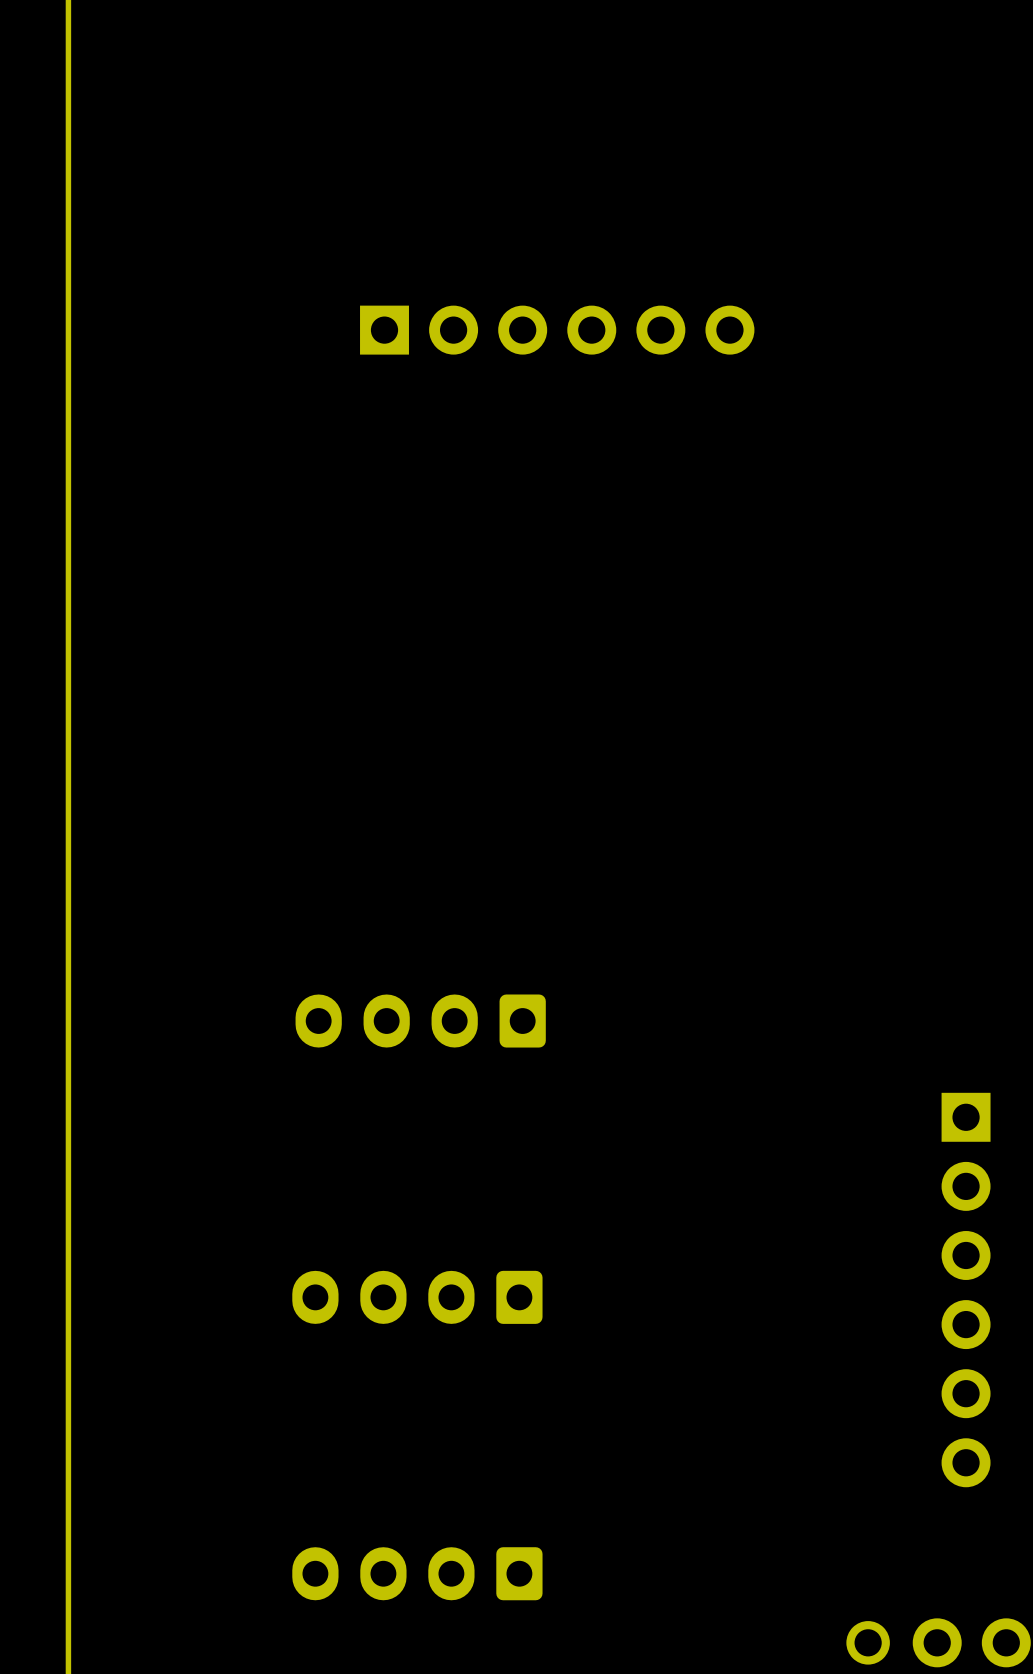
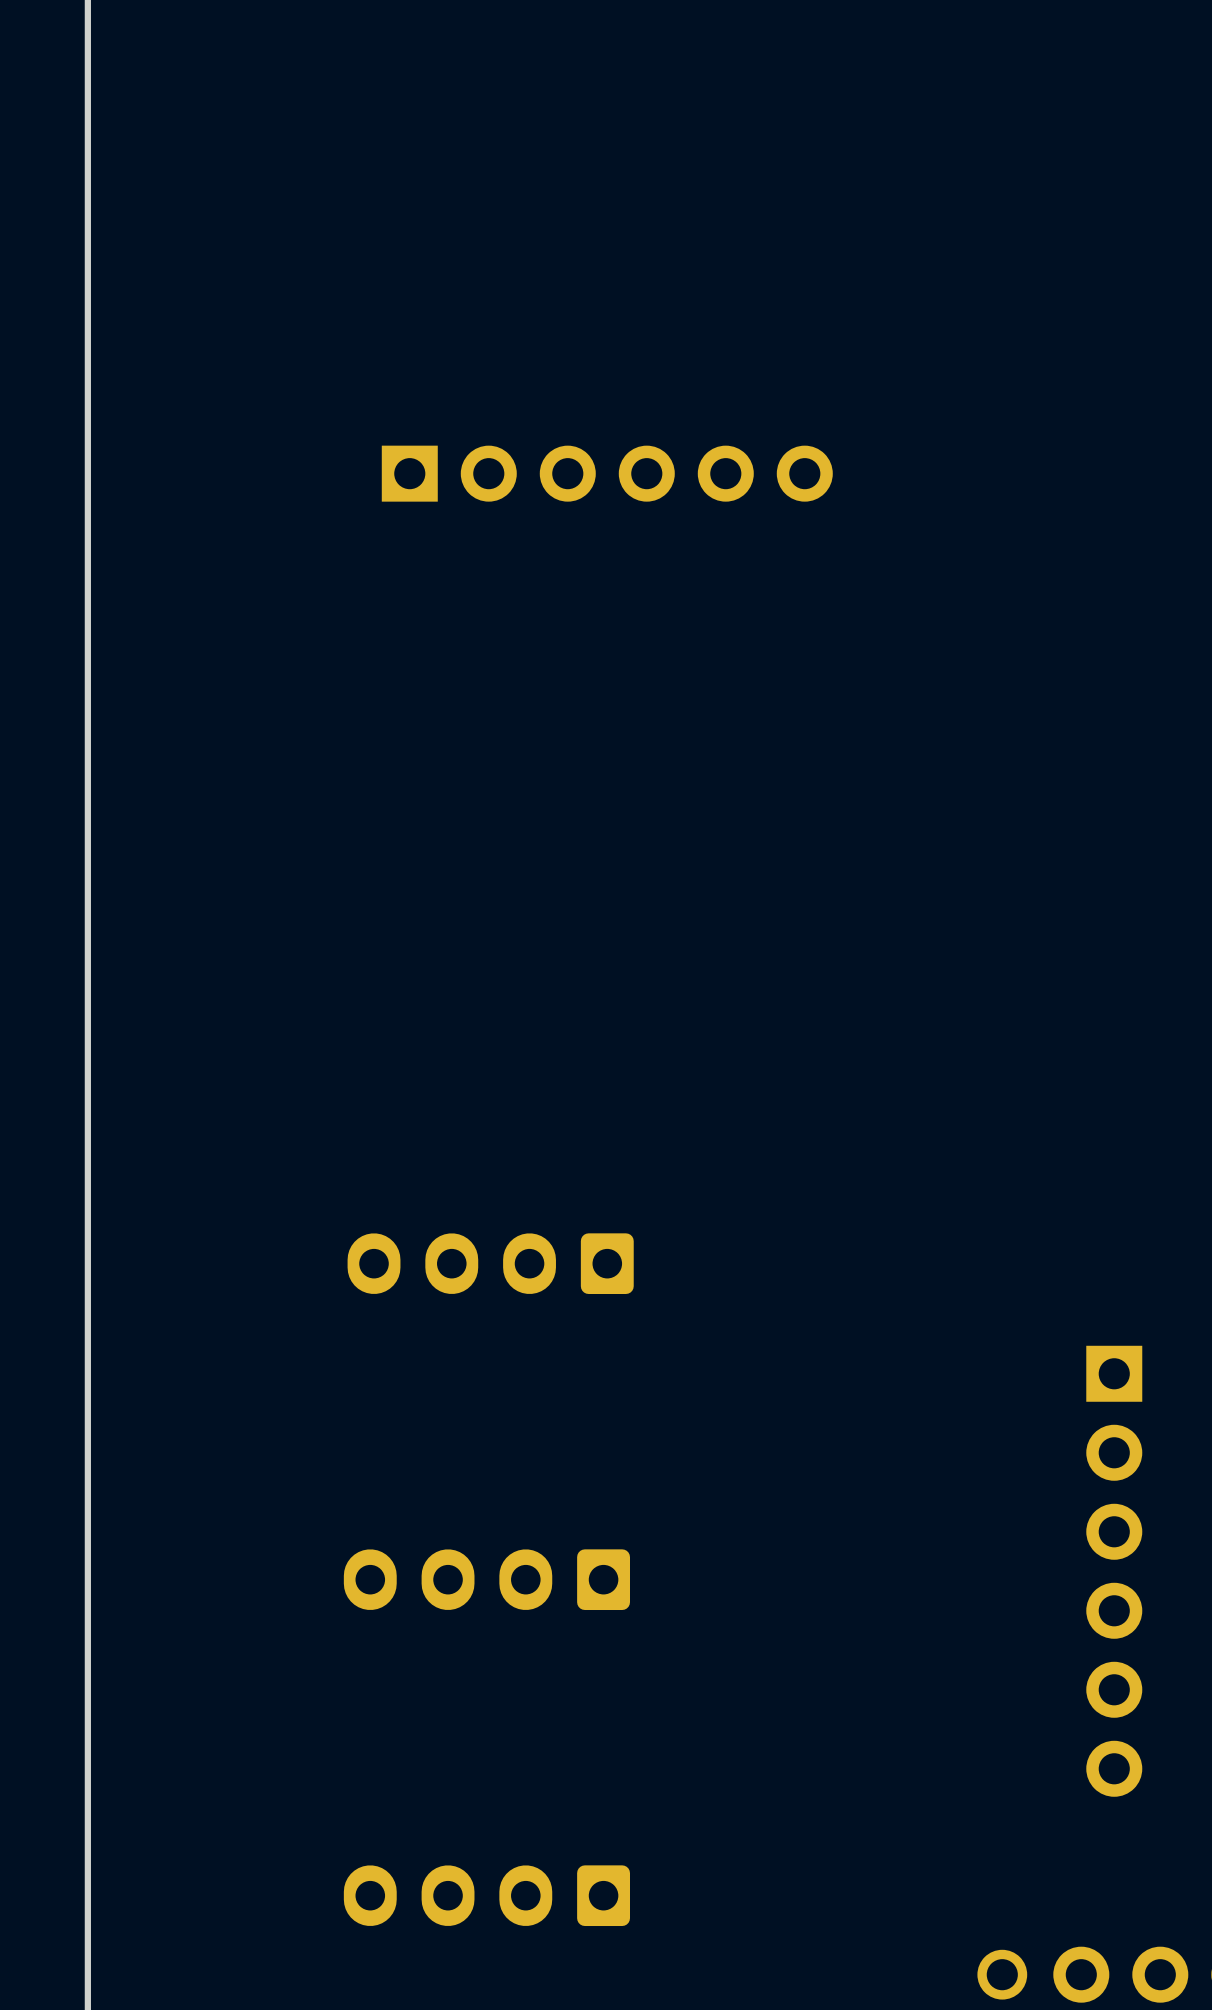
part position: (557, 330) -> (607, 473)

